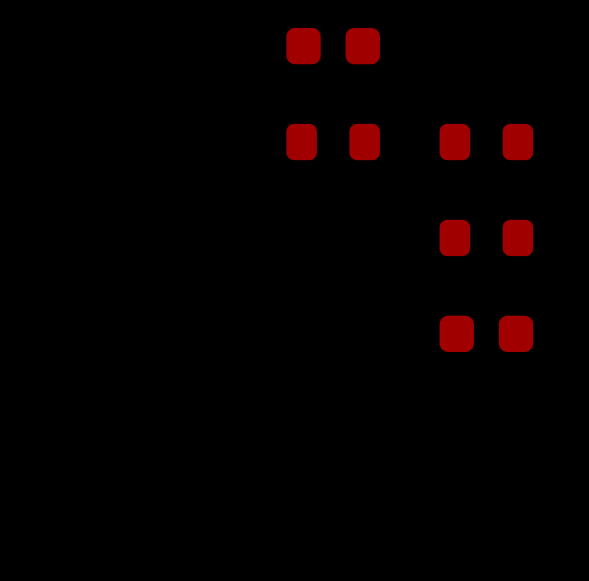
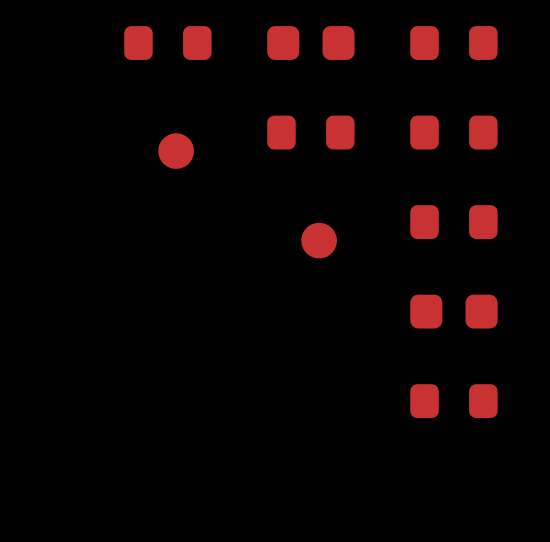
part: none -> (167, 43)
part: none -> (453, 43)
part: none -> (176, 151)
part: none -> (319, 240)
part: none -> (453, 401)

